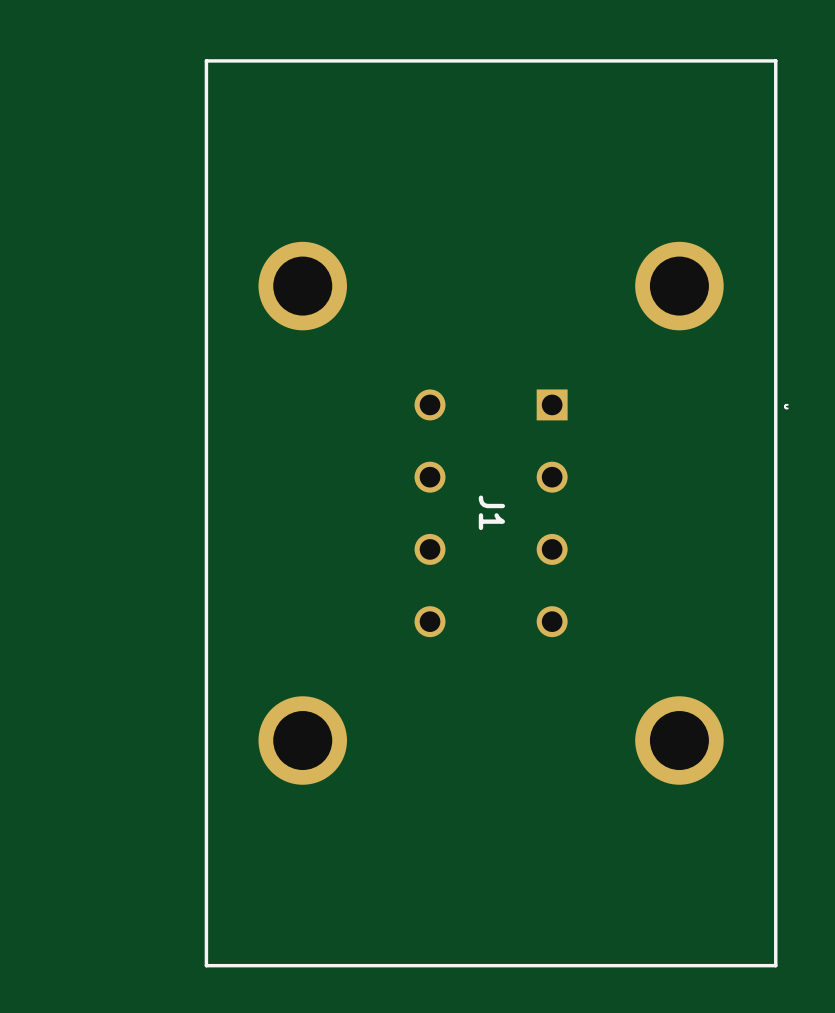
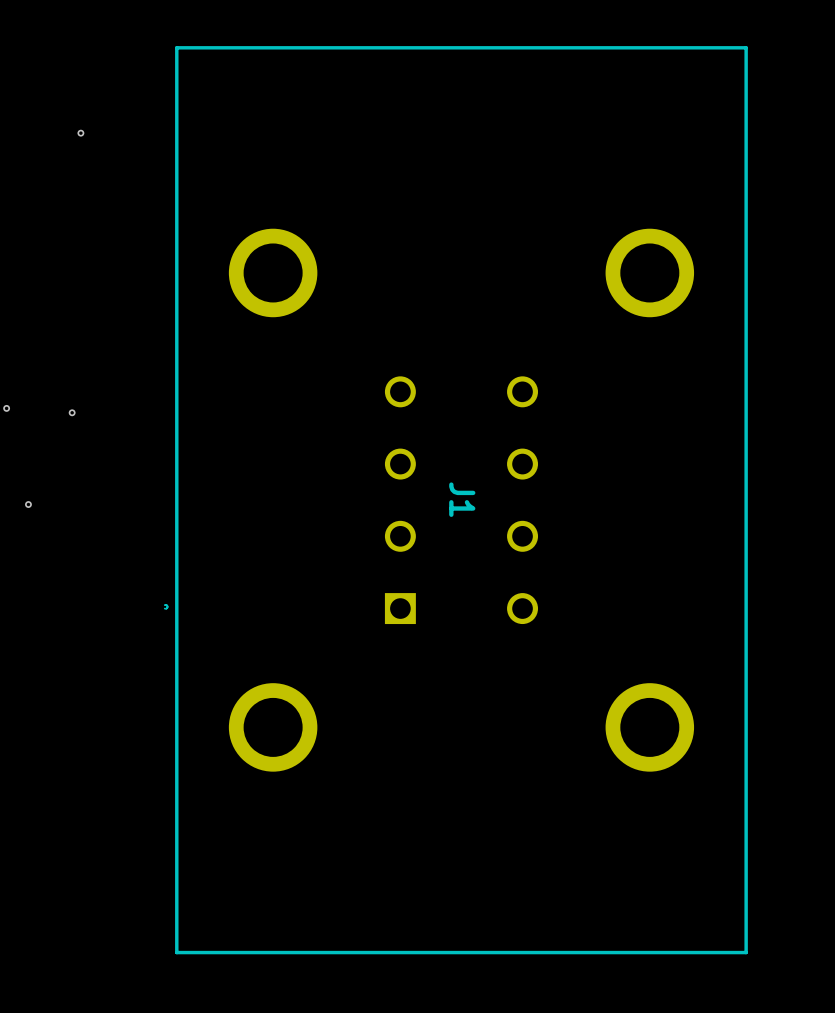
via: none -> (80, 133)
via: none -> (6, 408)
via: none -> (72, 412)
via: none -> (28, 504)
J1 rotation: 0° (496, 513) -> 180° (455, 500)

